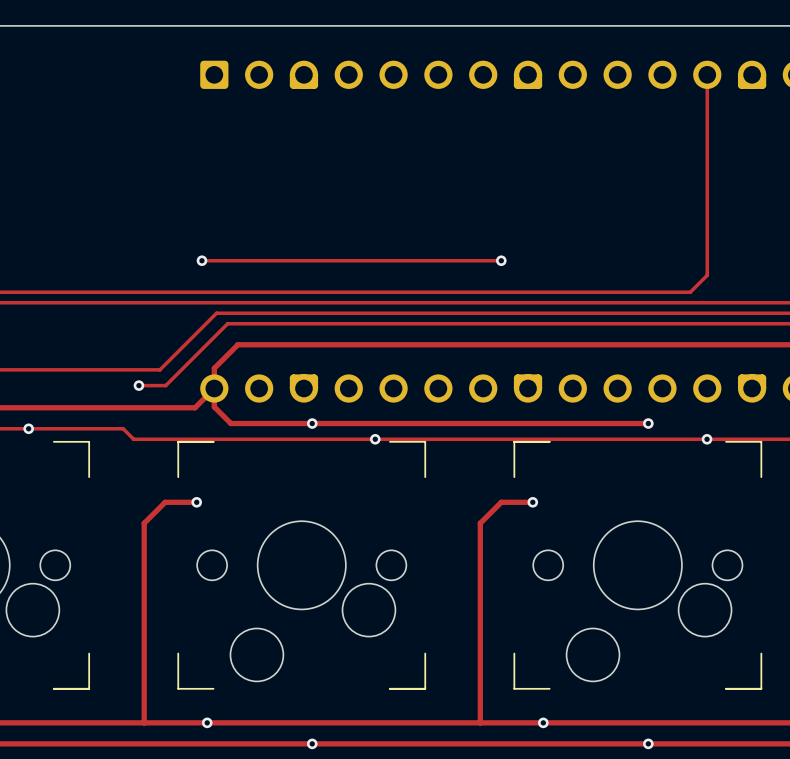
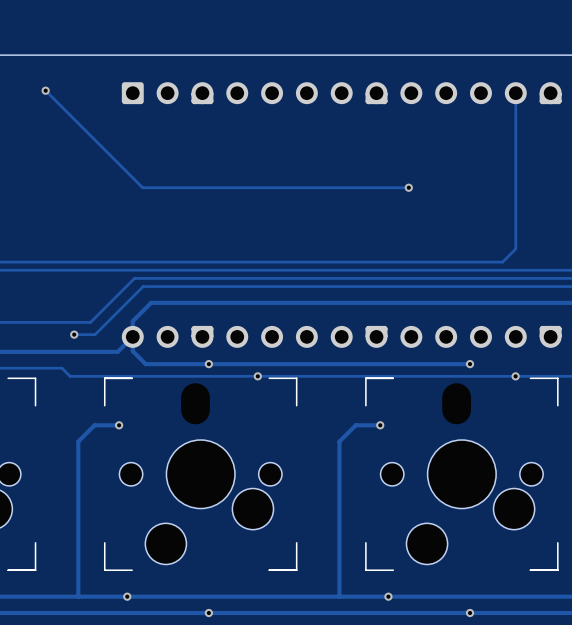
track: none -> (45, 90) (142, 187) (408, 187)
via: none -> (45, 90)
track: (201, 260) (501, 260) -> none
via: (201, 260) -> none
via position: (501, 260) -> (408, 187)

